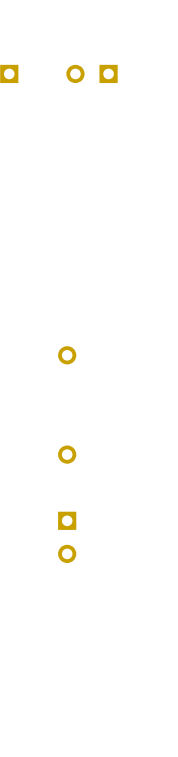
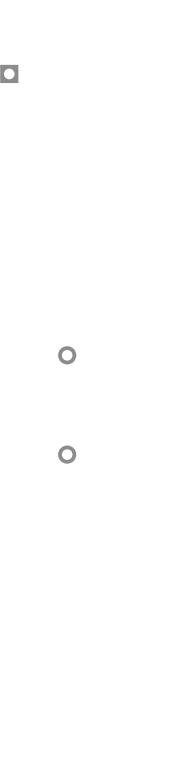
part: (92, 73) -> none
part: (67, 537) -> none

